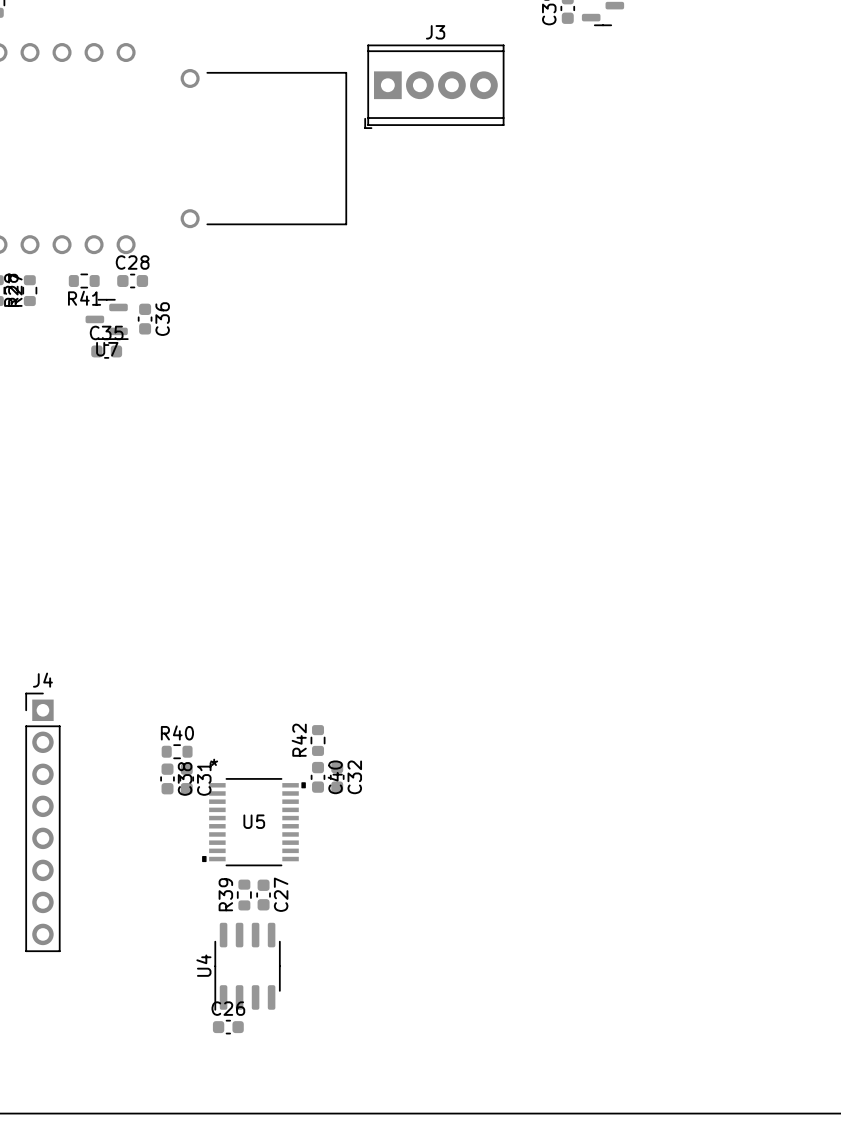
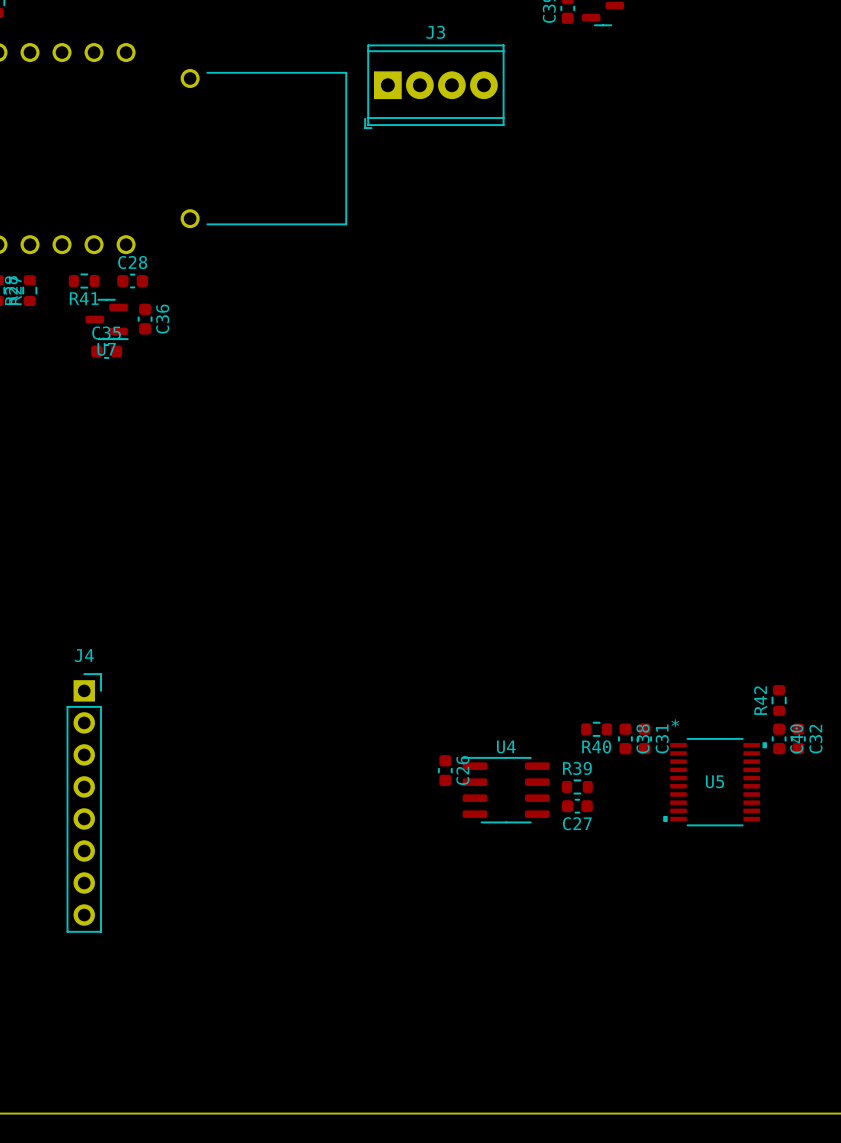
J4 footprint: [25, 692, 61, 952] -> [66, 673, 102, 933]
R40 name position: R40 (177, 732) -> R40 (596, 746)
R42 position: (318, 740) -> (779, 700)
R40 position: (177, 751) -> (596, 729)
C40 position: (318, 777) -> (779, 738)
C32 position: (337, 777) -> (798, 738)
C38 position: (167, 778) -> (625, 738)
C31 position: (186, 778) -> (644, 738)
U5 position: (253, 822) -> (715, 782)
R39 rotation: 0° (244, 895) -> 90° clockwise (577, 786)
R39 position: (244, 895) -> (577, 786)
C27 rotation: 0° (263, 895) -> 90° clockwise (577, 806)
C27 position: (263, 895) -> (577, 806)
U4 rotation: 0° (247, 966) -> 90° clockwise (505, 790)
U4 position: (247, 966) -> (505, 790)
C26 rotation: 0° (228, 1027) -> 90° clockwise (445, 770)
C26 position: (228, 1027) -> (445, 770)

